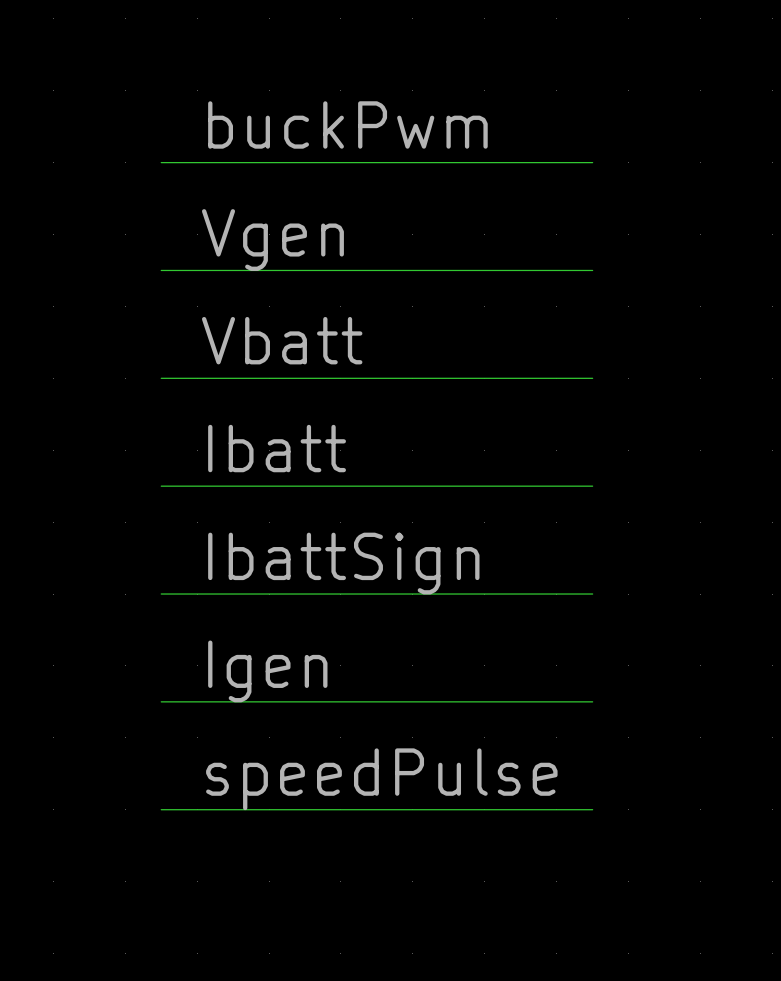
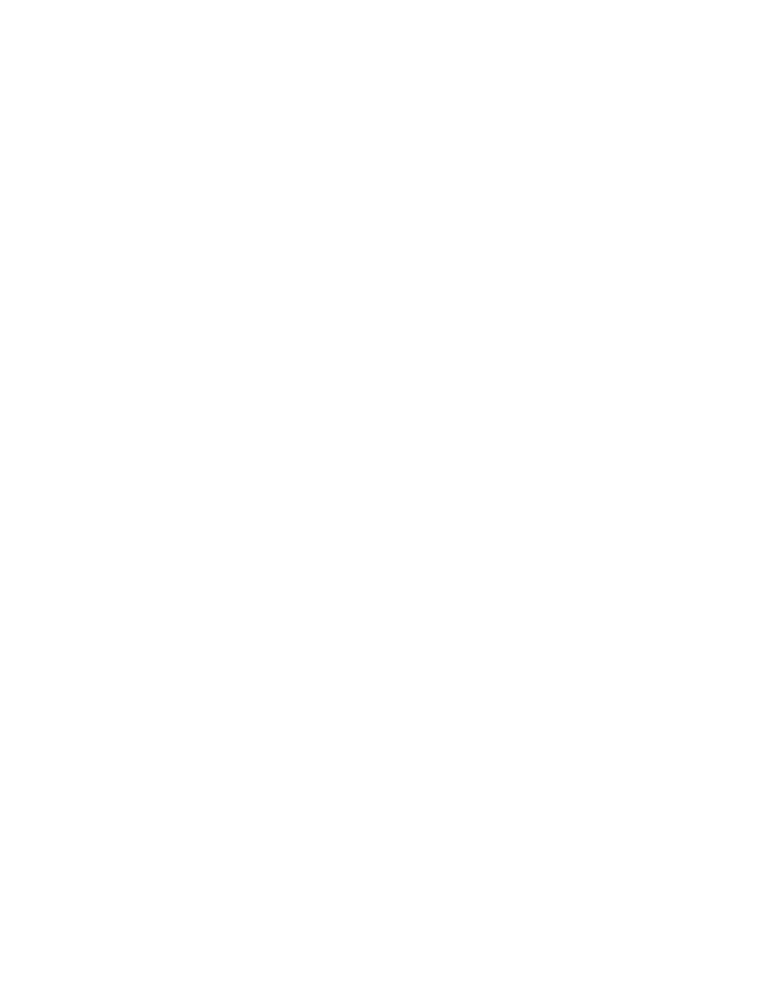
label: buckPwm (347, 124) -> none
wire: (161, 162) (592, 162) -> none
label: Vgen (272, 240) -> none
wire: (161, 270) (592, 270) -> none
label: Vbatt (282, 340) -> none
wire: (161, 378) (592, 378) -> none
label: Ibatt (277, 448) -> none
wire: (161, 486) (592, 486) -> none
label: IbattSign (343, 563) -> none
wire: (161, 594) (592, 594) -> none
label: Igen (267, 671) -> none
wire: (161, 701) (592, 701) -> none
label: speedPulse (381, 779) -> none
wire: (161, 809) (592, 809) -> none

